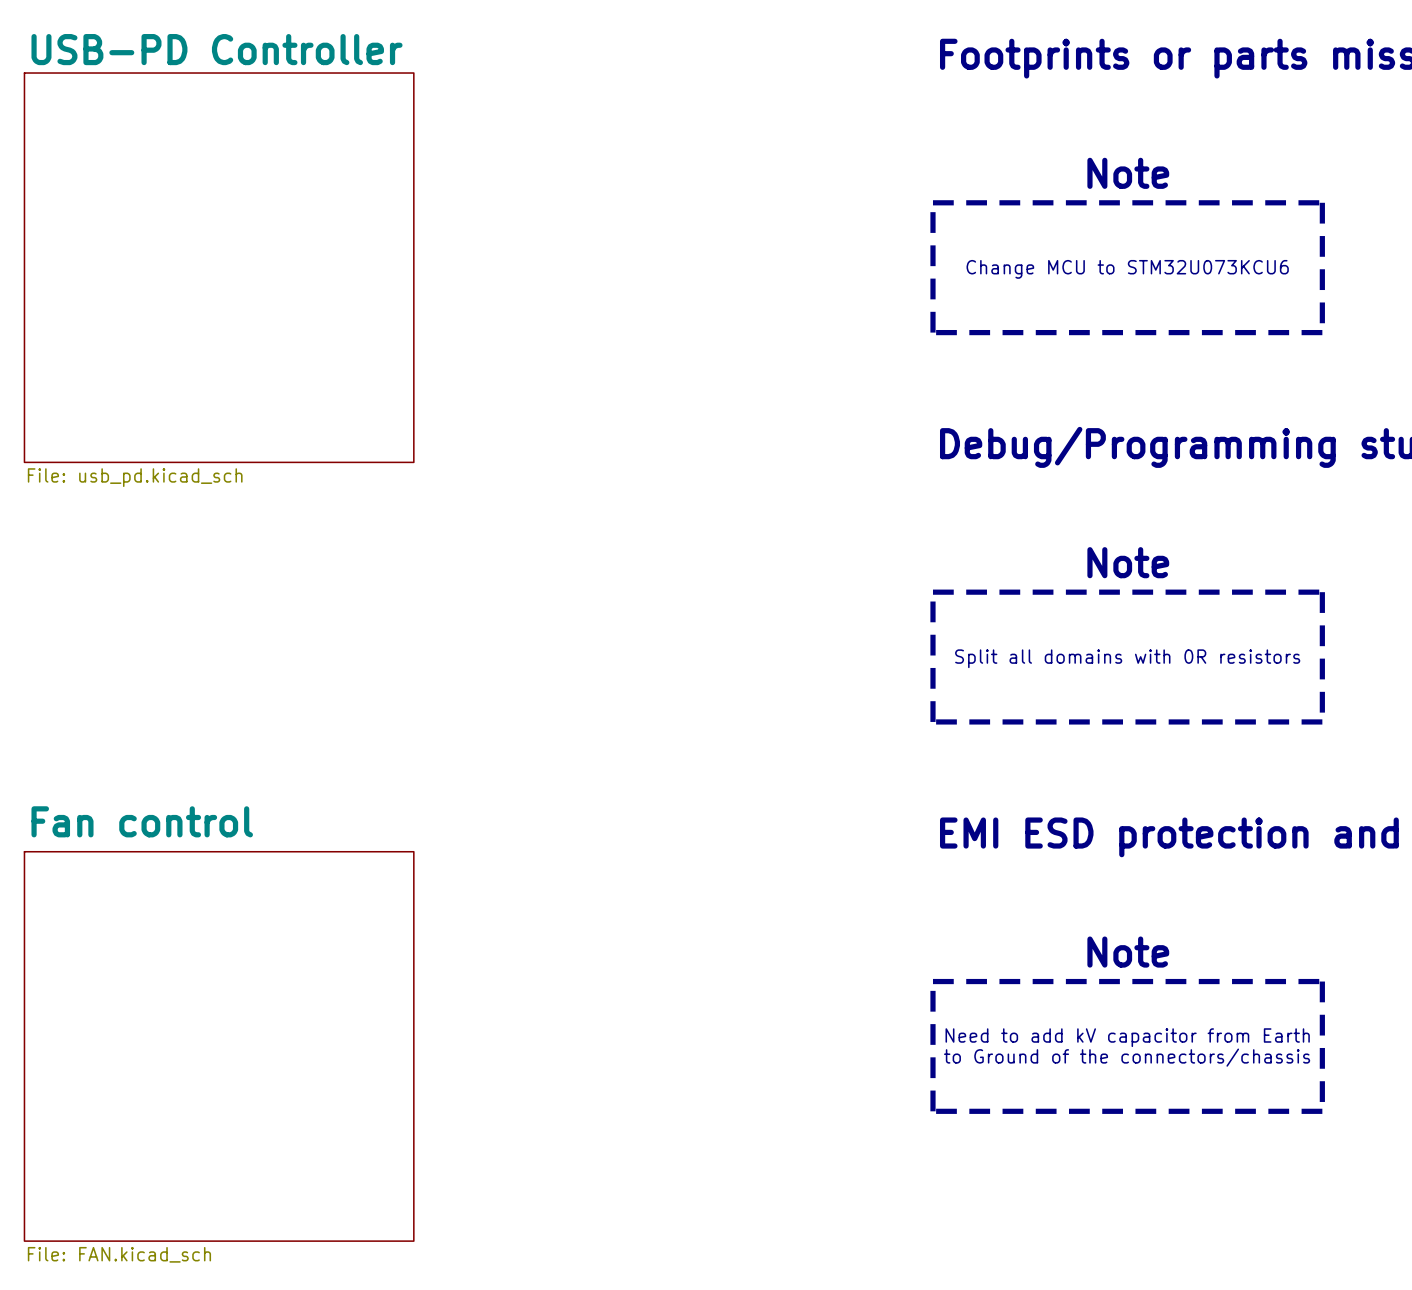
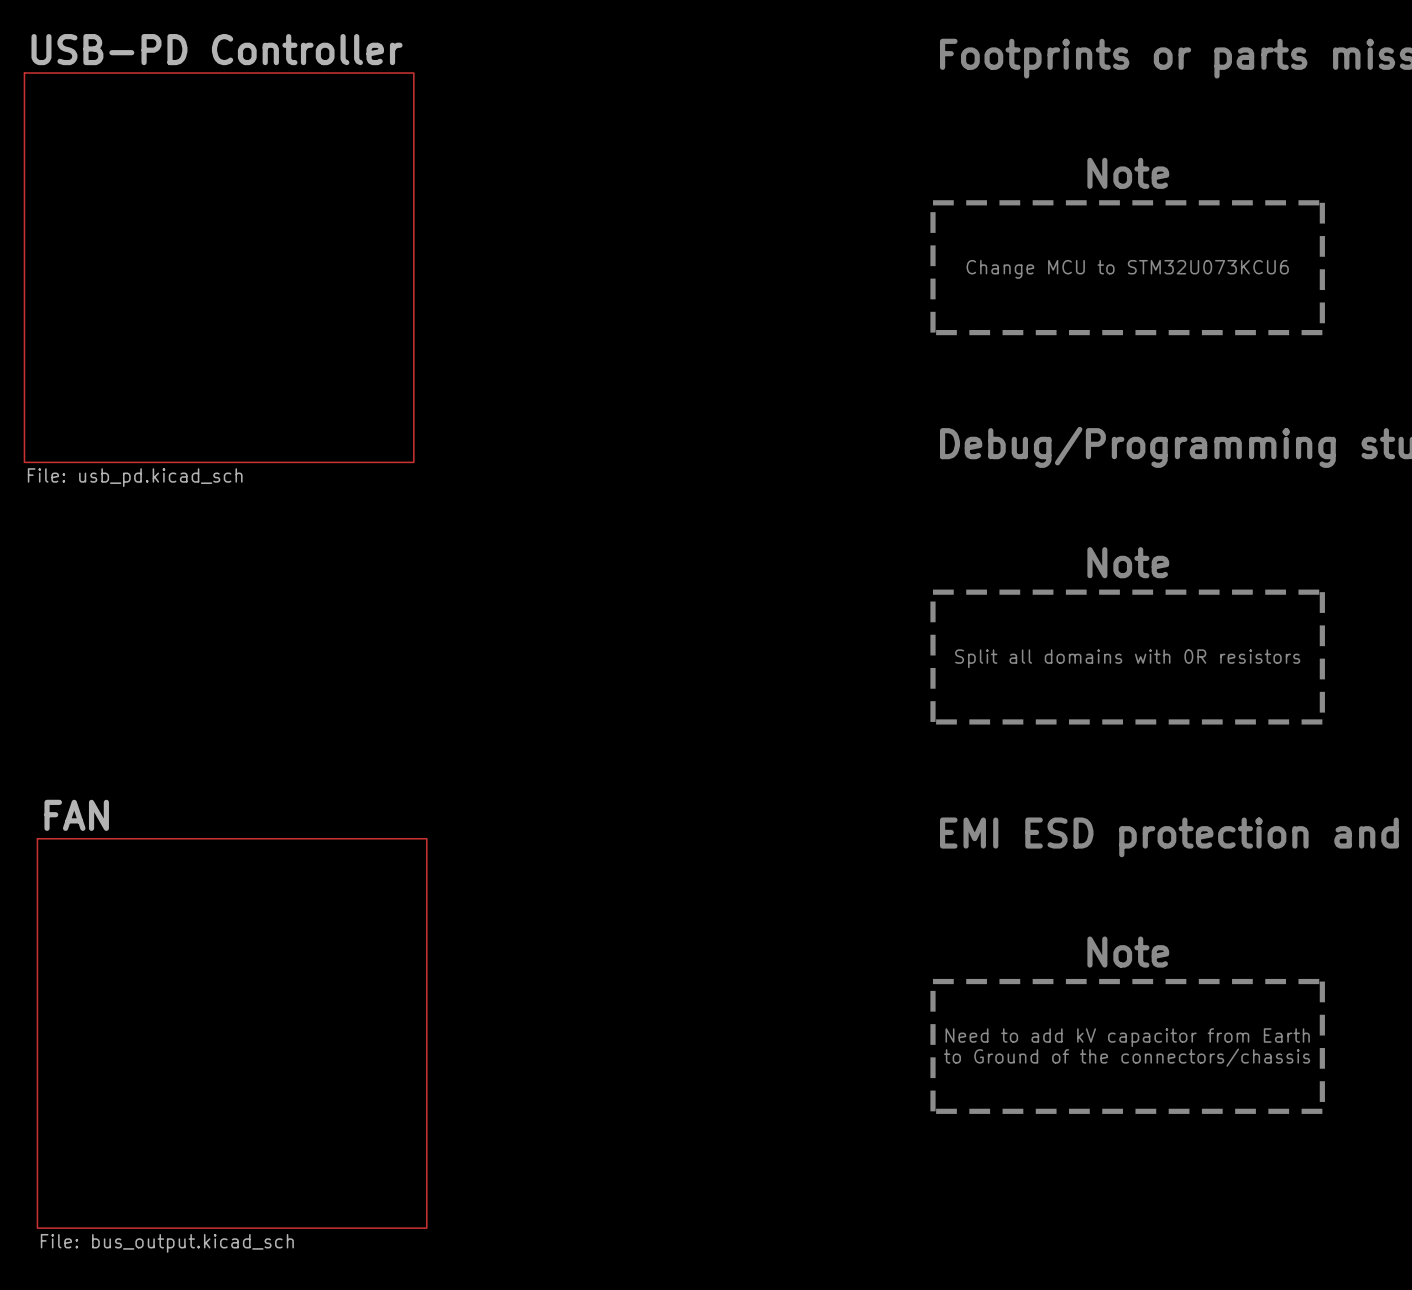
sheet FAN: none -> File: bus_output.kicad_sch (232, 1033)
sheet Fan control: File: FAN.kicad_sch (219, 1046) -> none

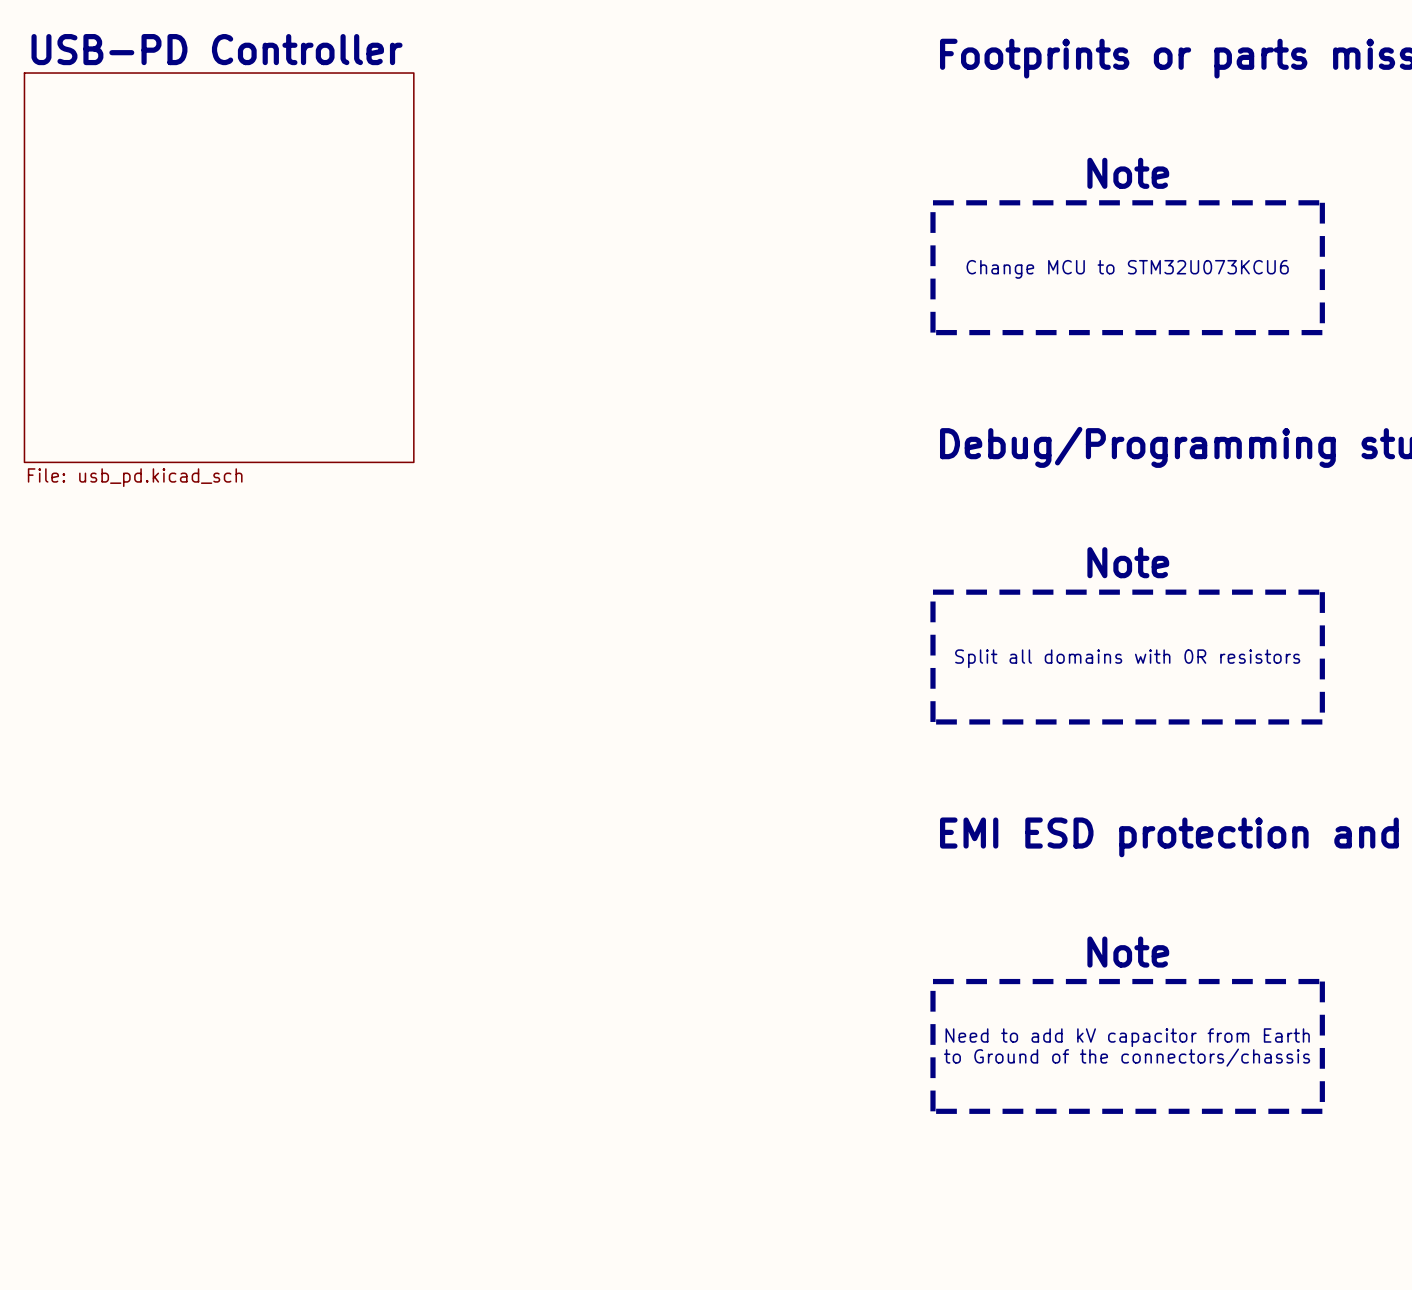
sheet FAN: File: bus_output.kicad_sch (232, 1033) -> none

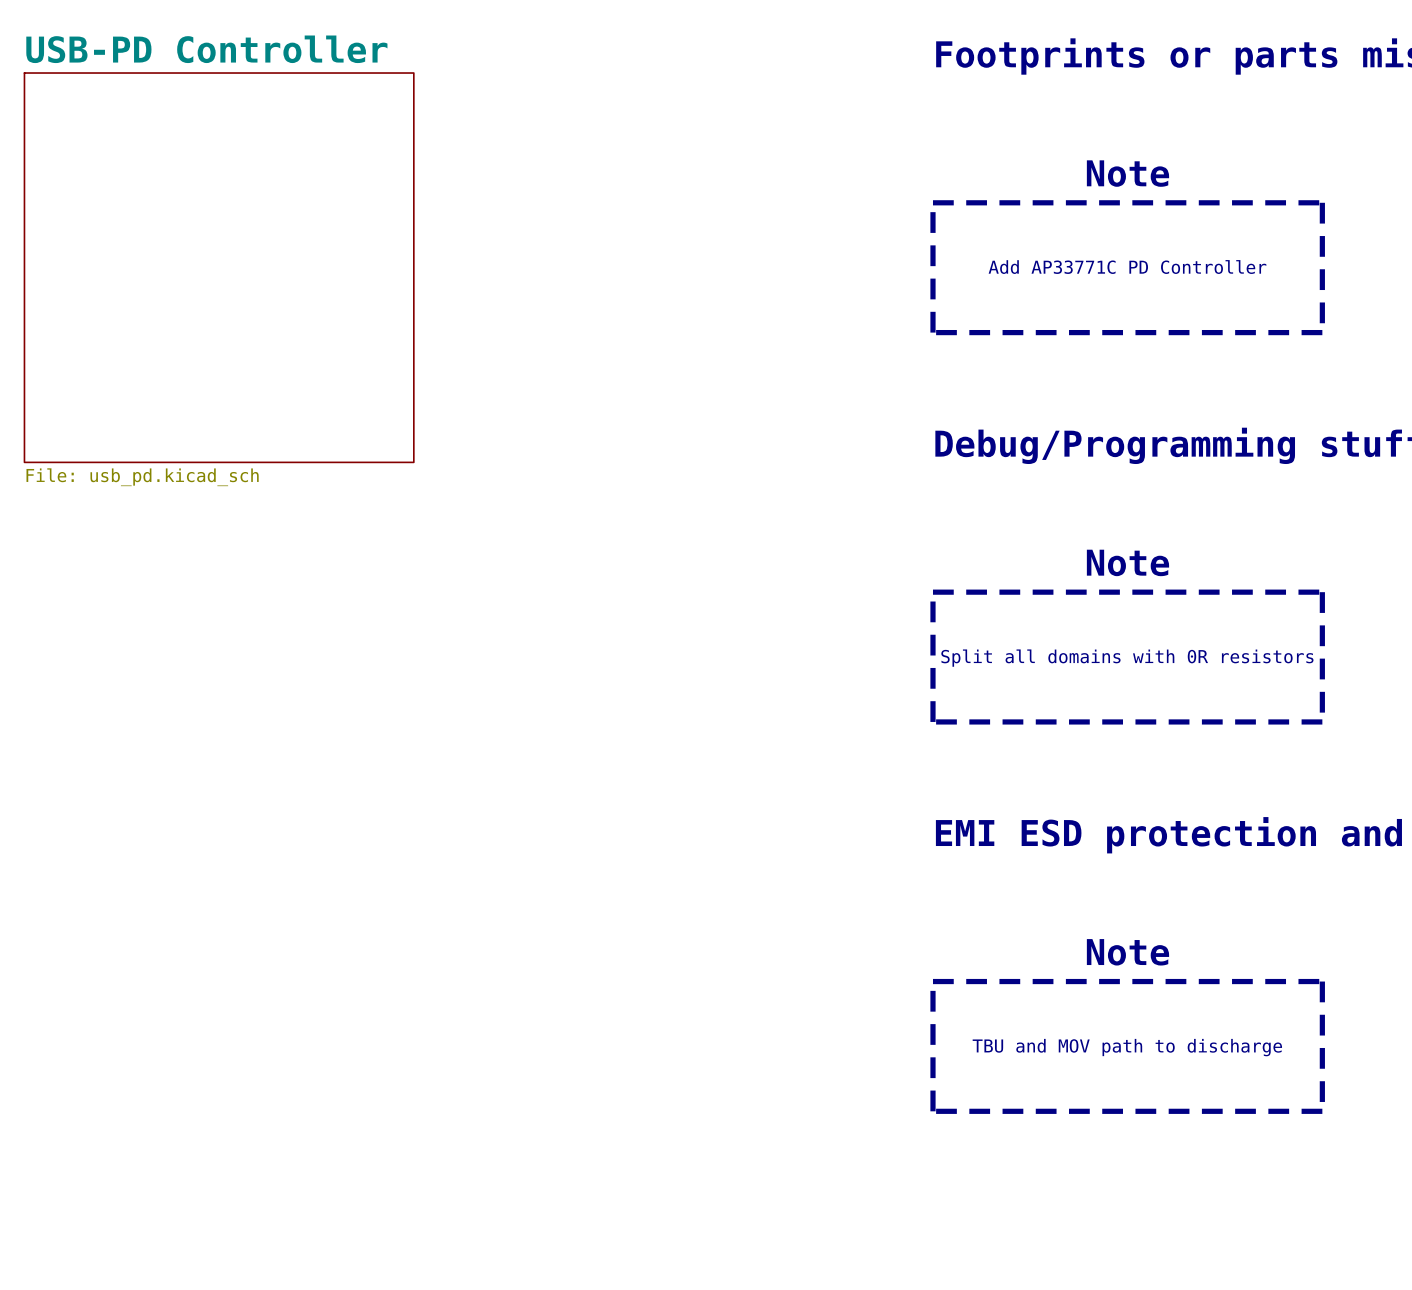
text: Change MCU to STM32U073KCU6 (1127, 269) -> Add AP33771C PD Controller (1127, 267)
text: Need to add kV capacitor from Earth (1127, 1037) -> none
text: none -> TBU and MOV path to discharge (1127, 1047)
text: to Ground of the connectors/chassis (1127, 1057) -> none

